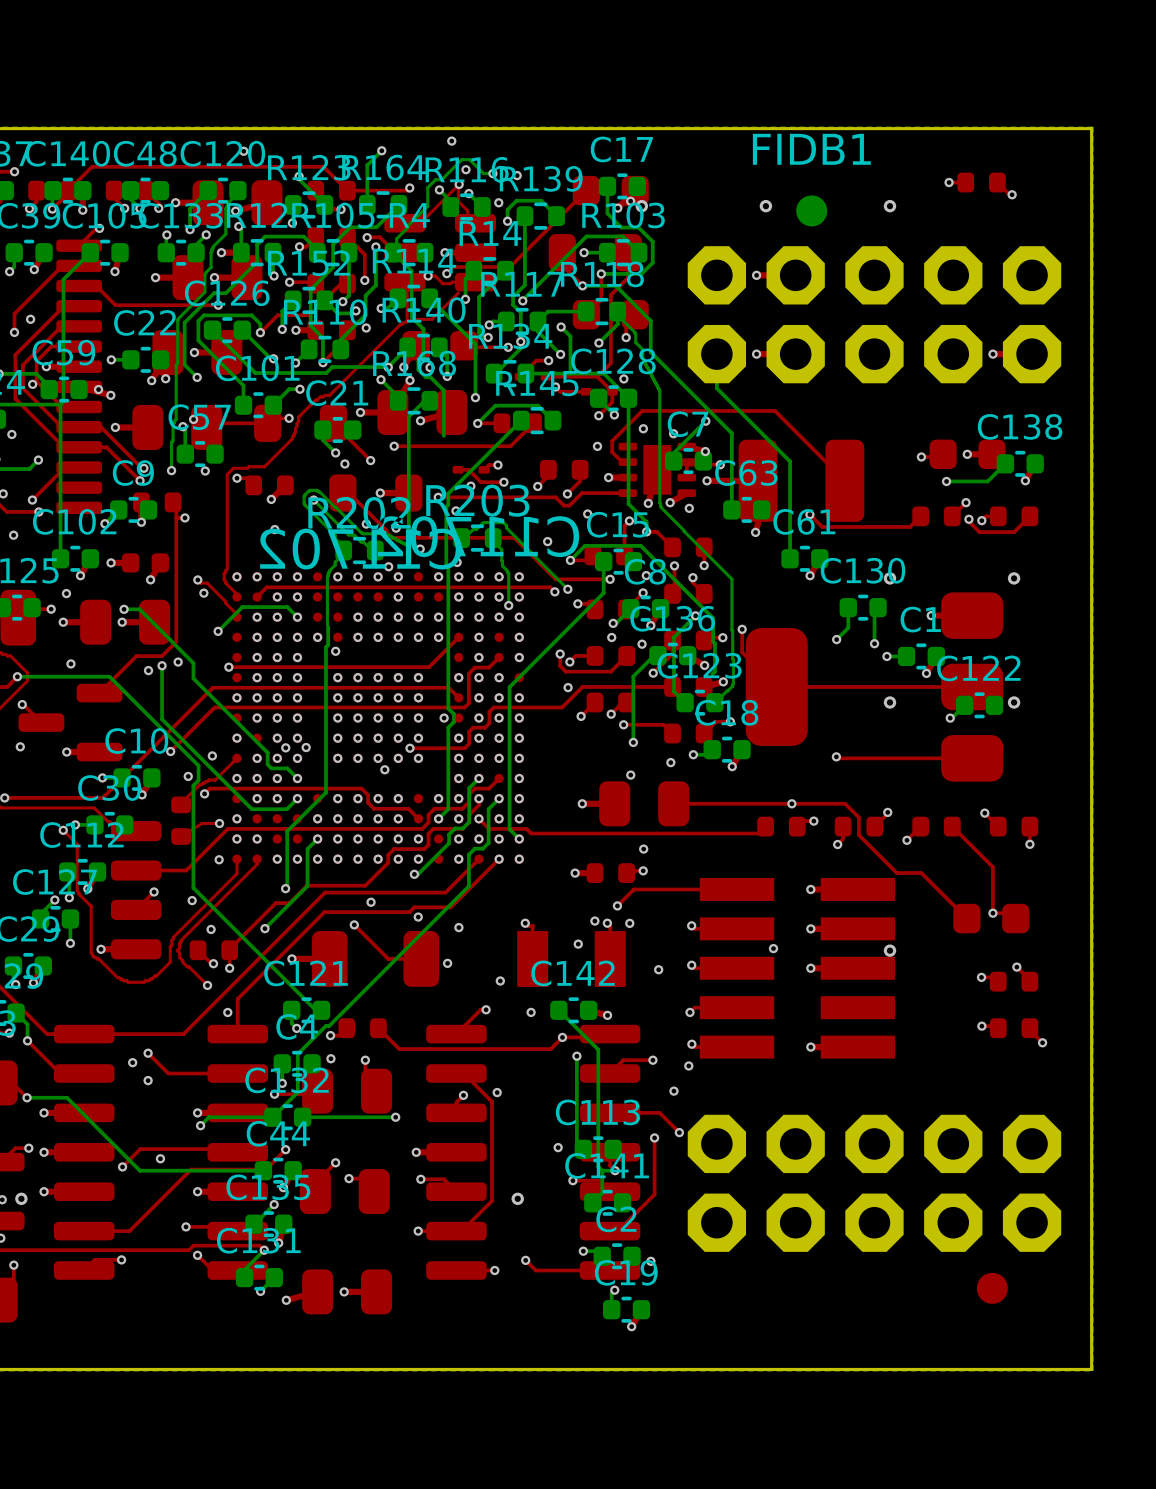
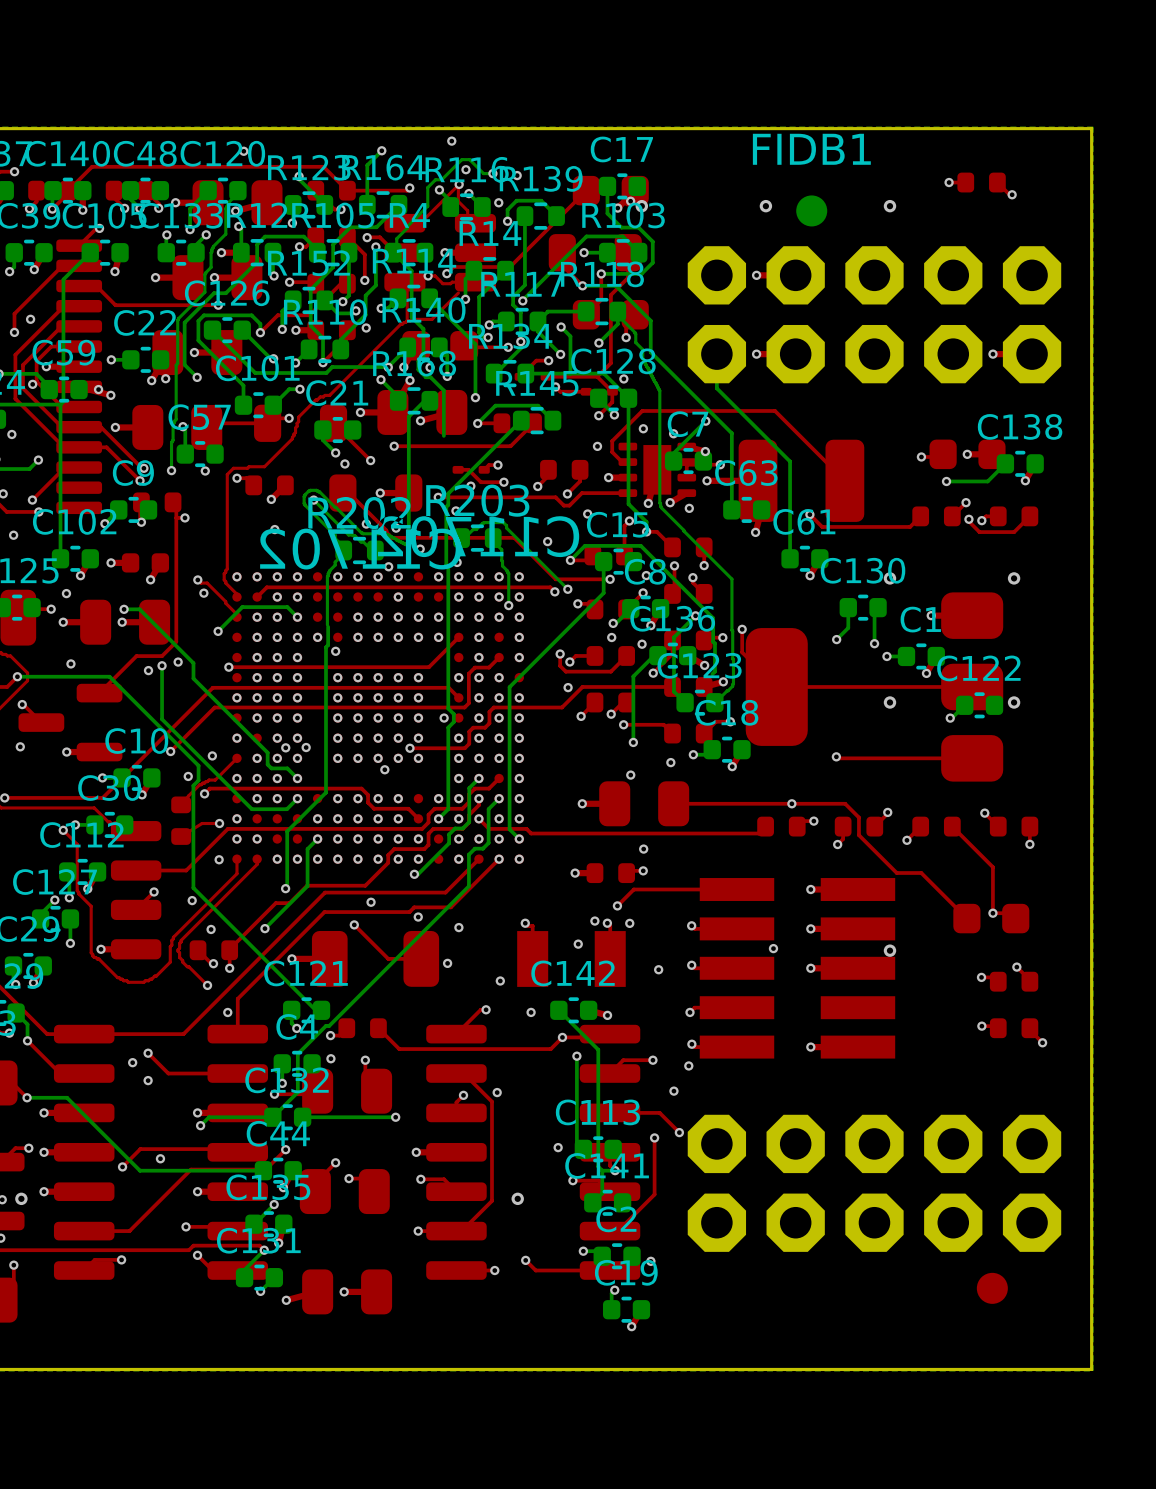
via: (193, 419) -> none

